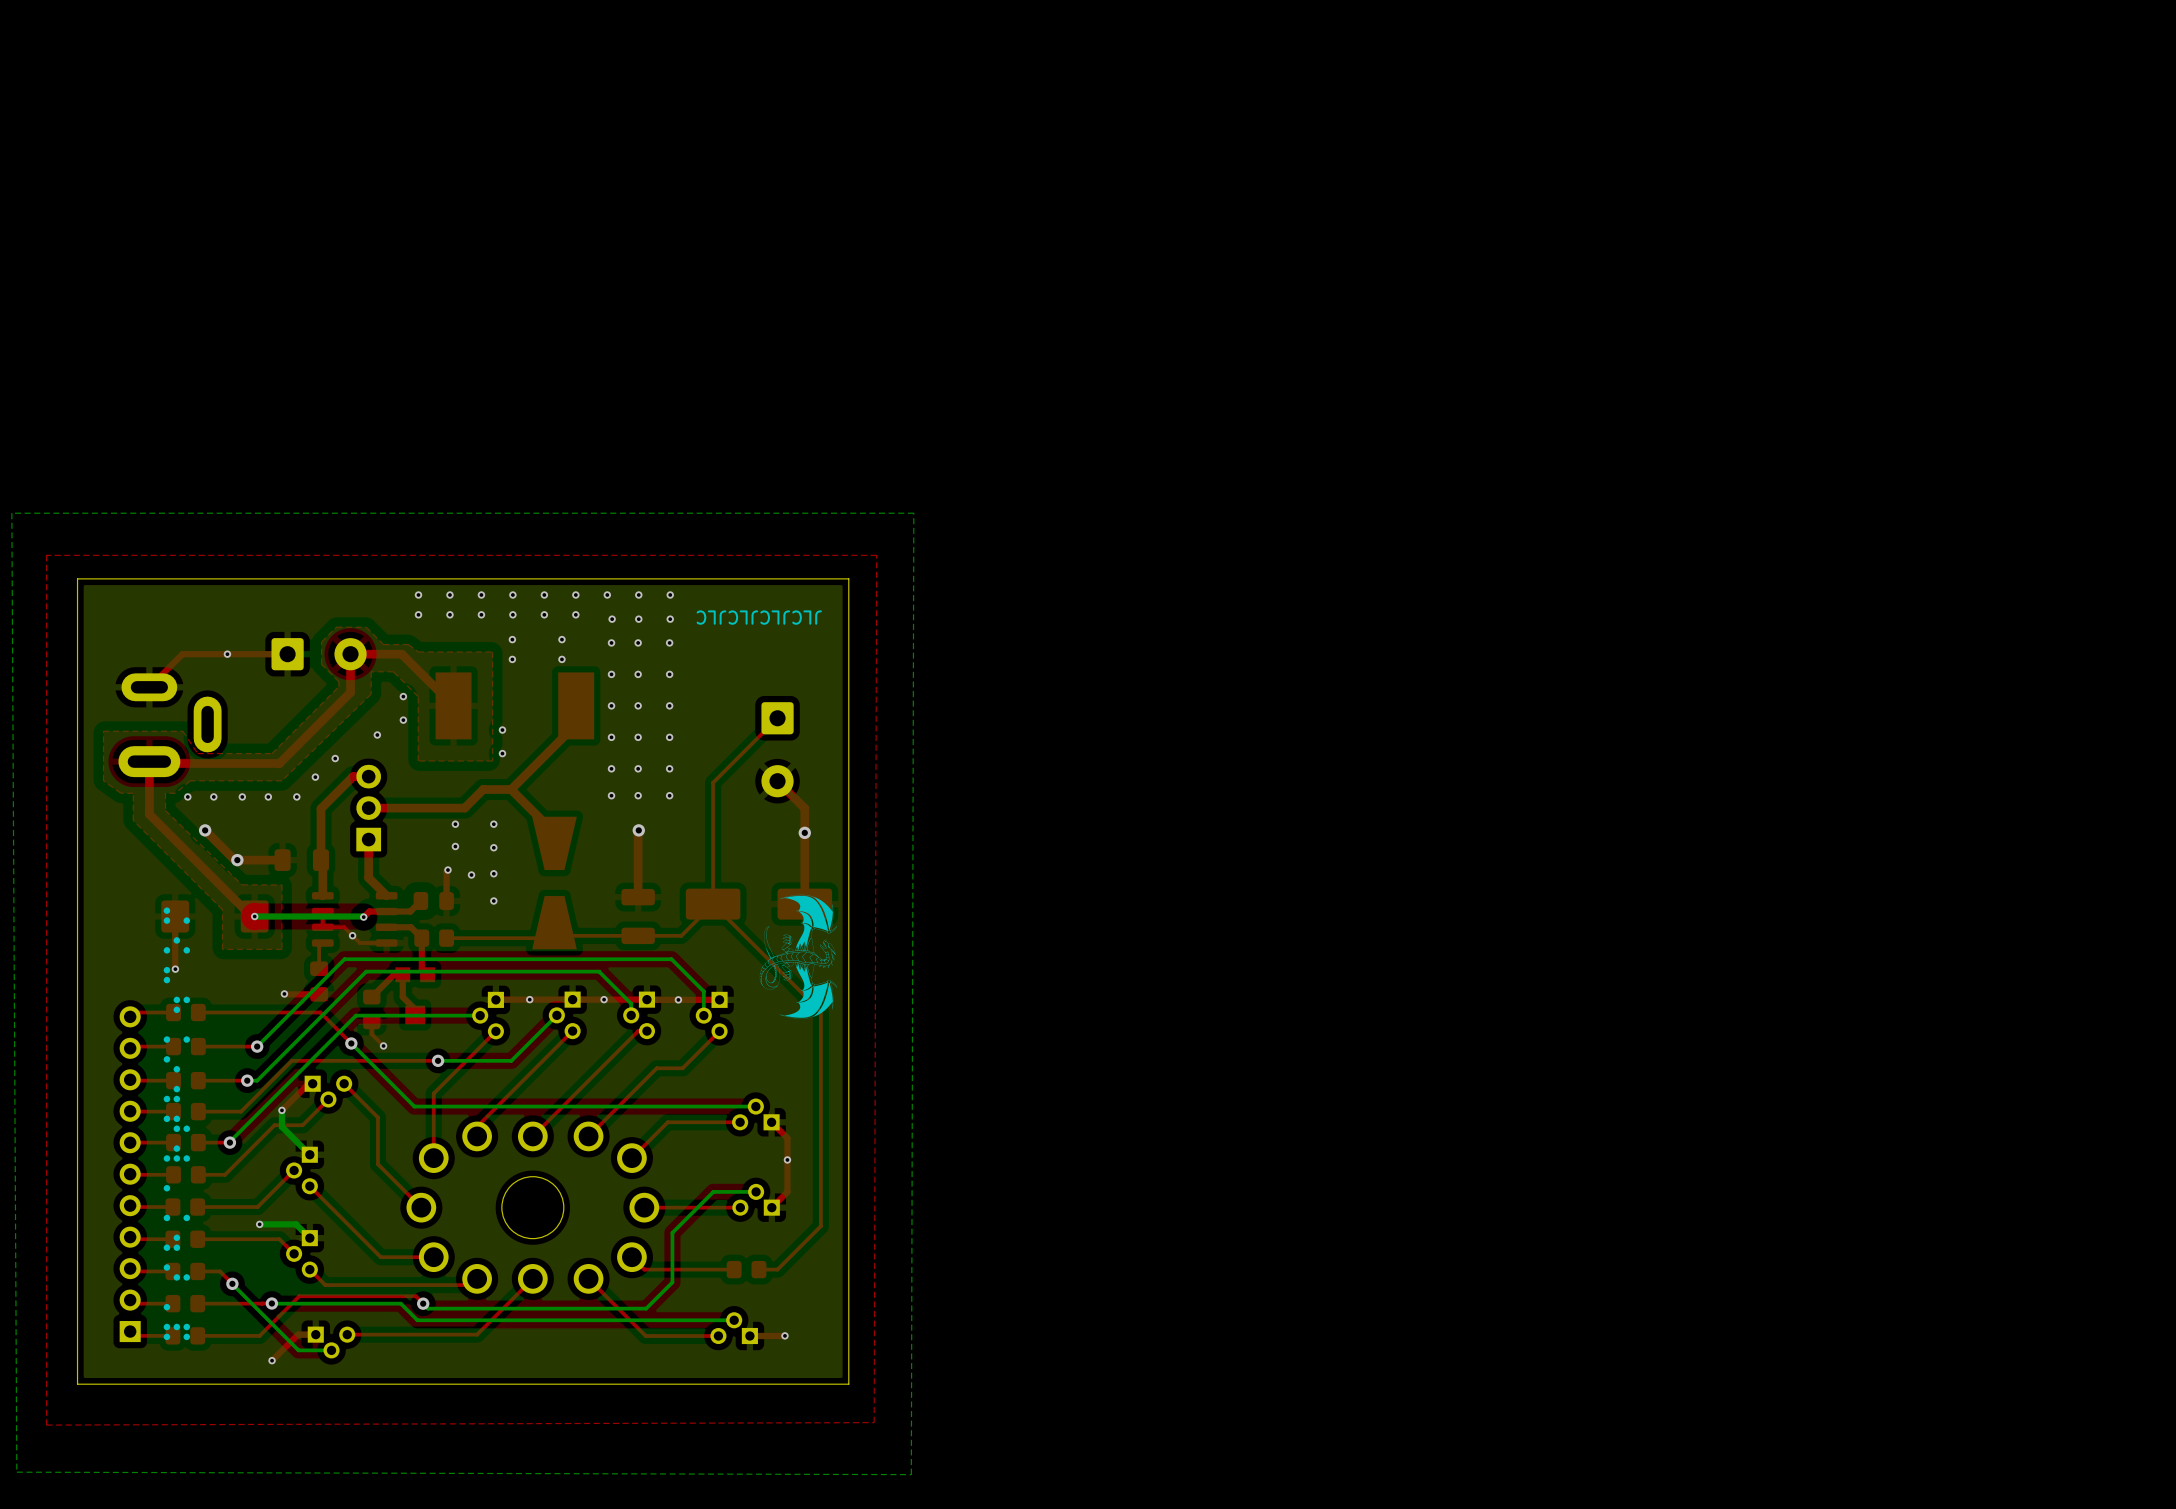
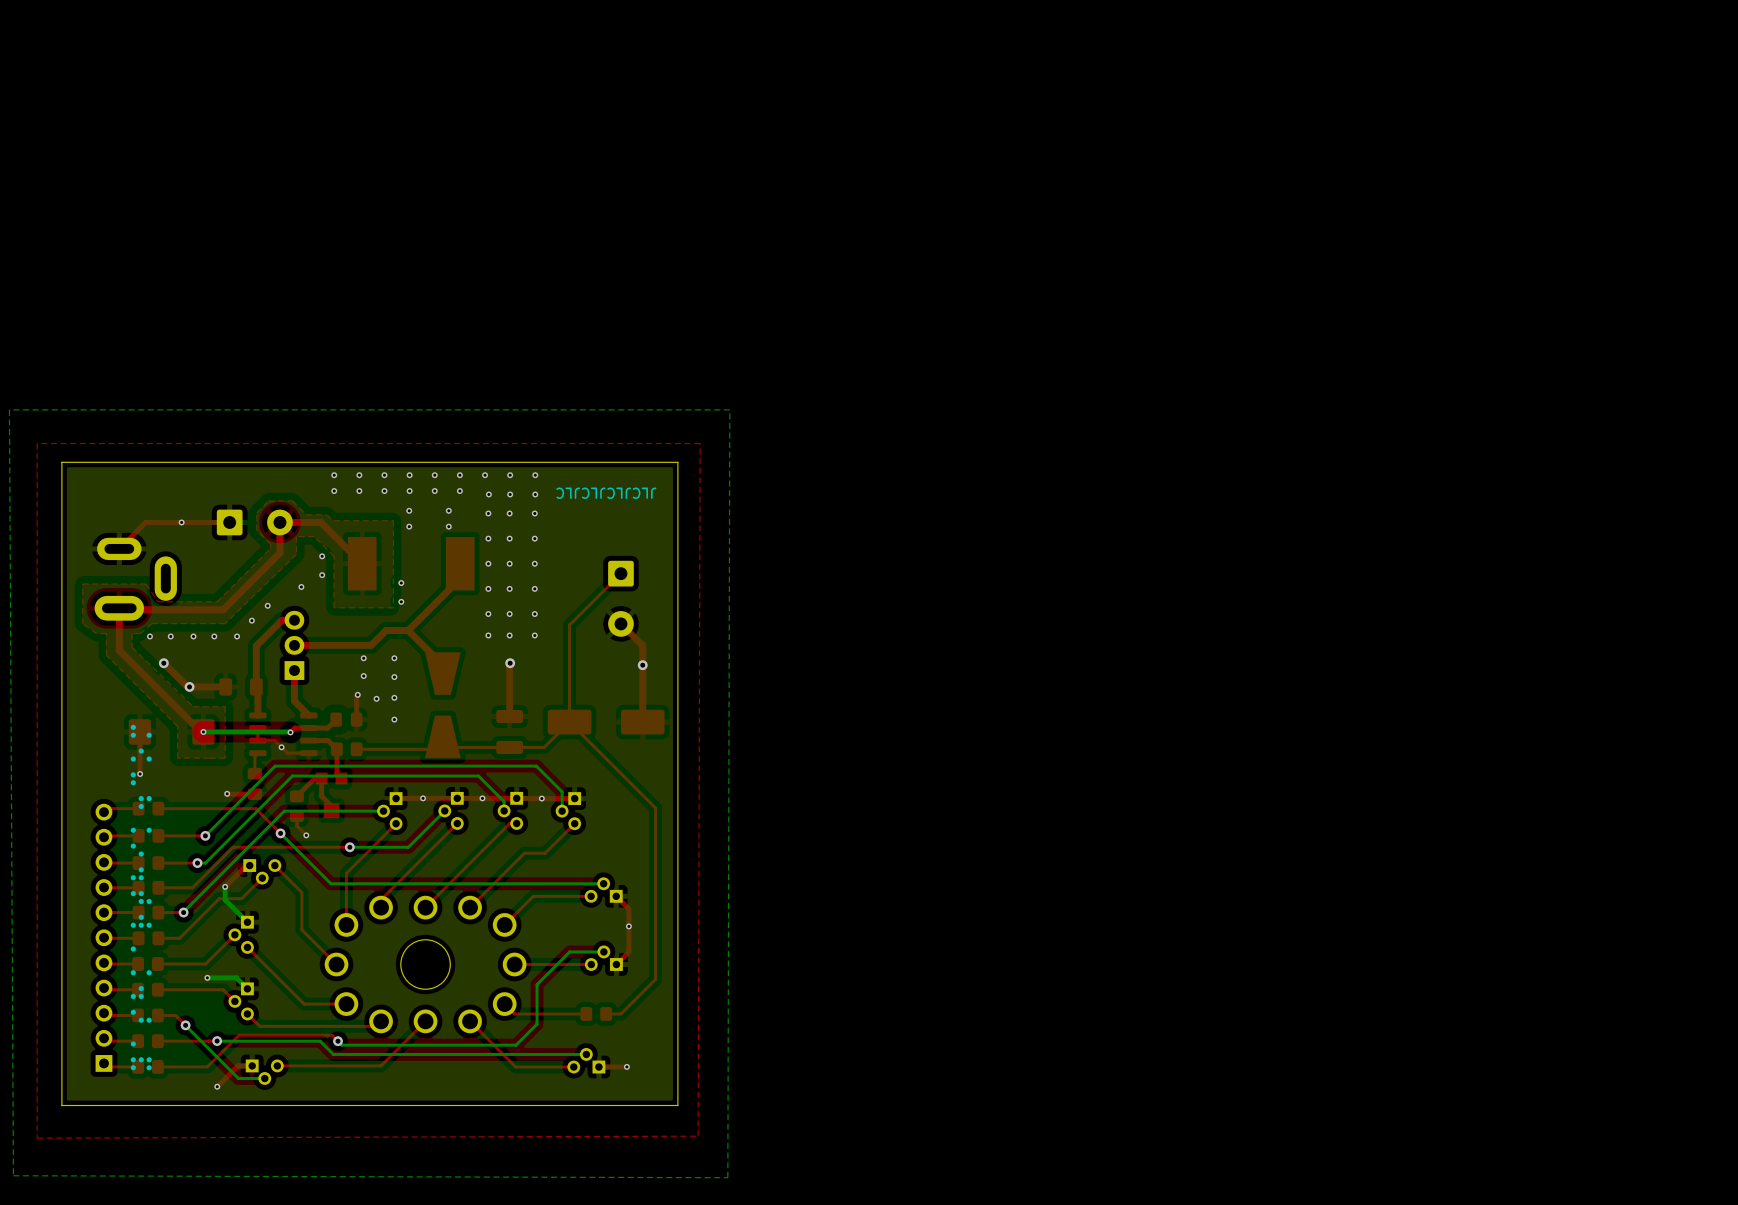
drawing: [759, 894, 838, 1019] -> none

